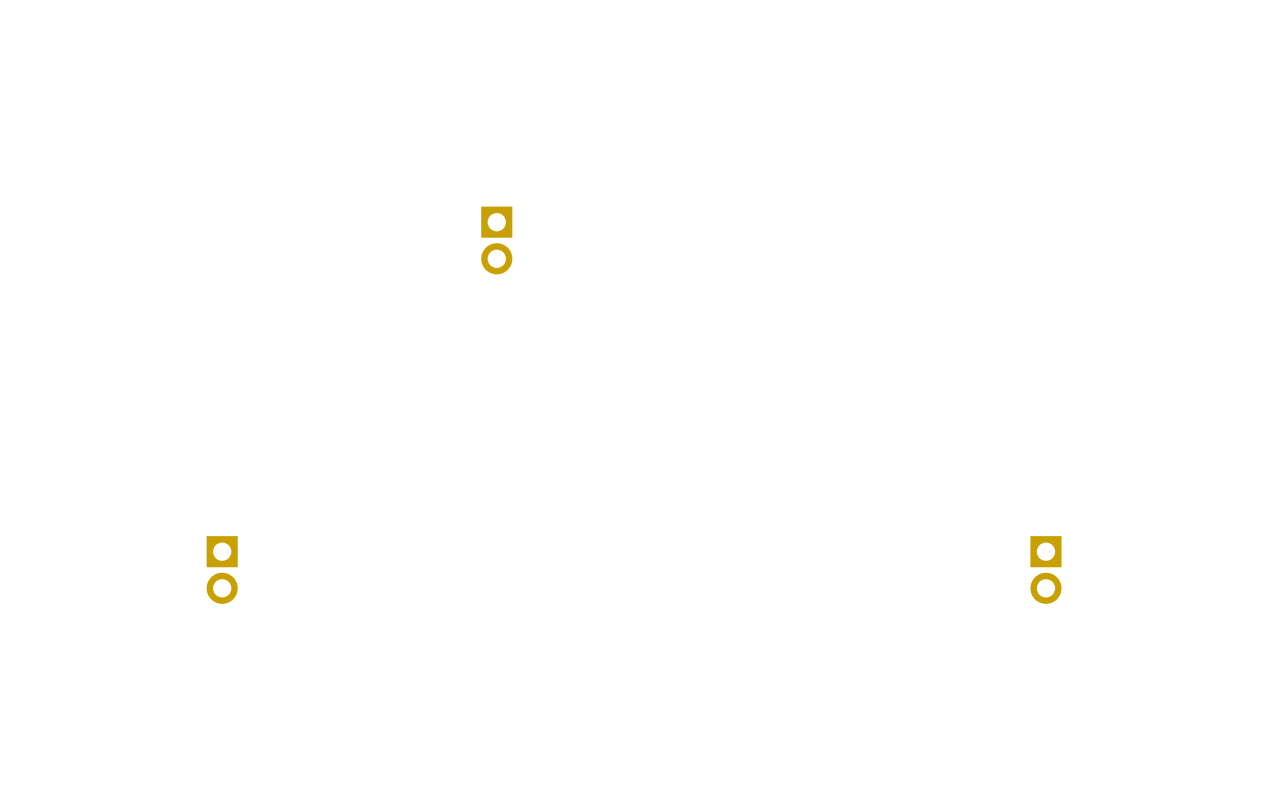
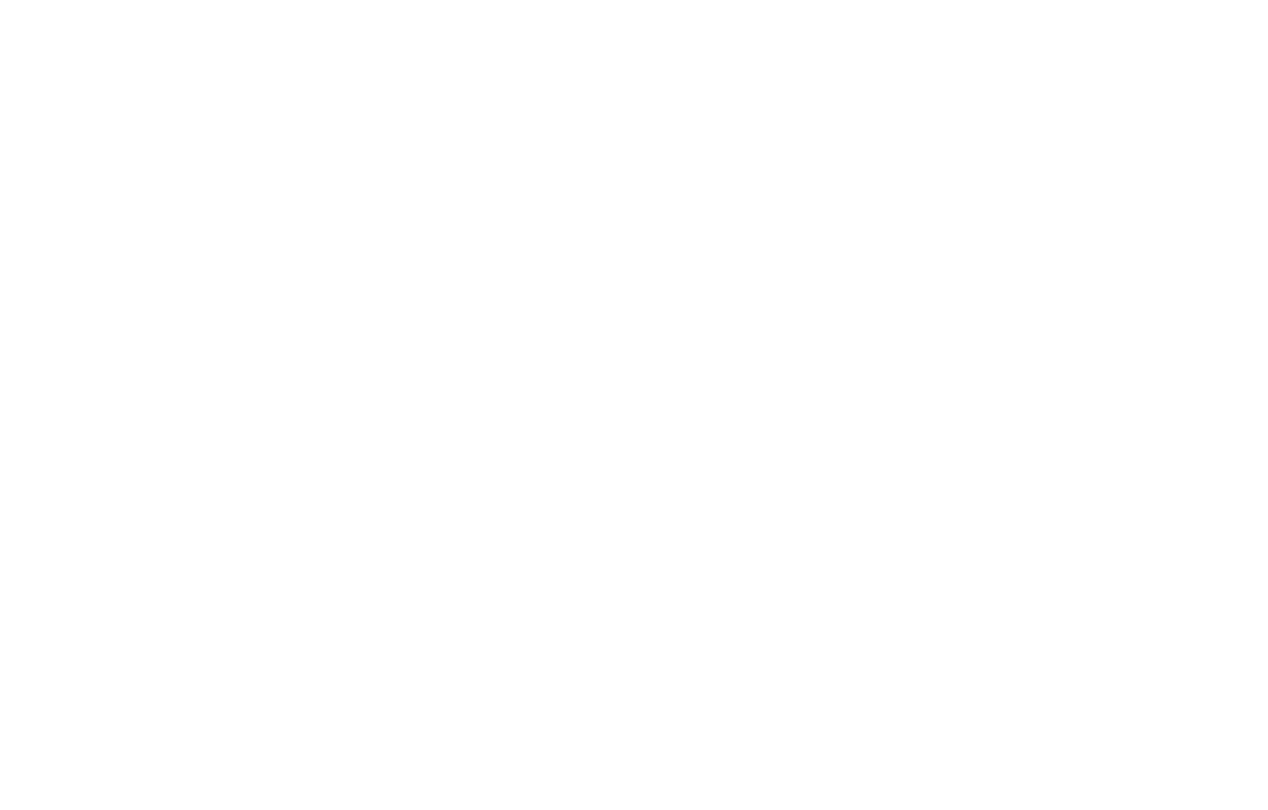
part: (496, 240) -> none
part: (222, 570) -> none
part: (1045, 570) -> none

